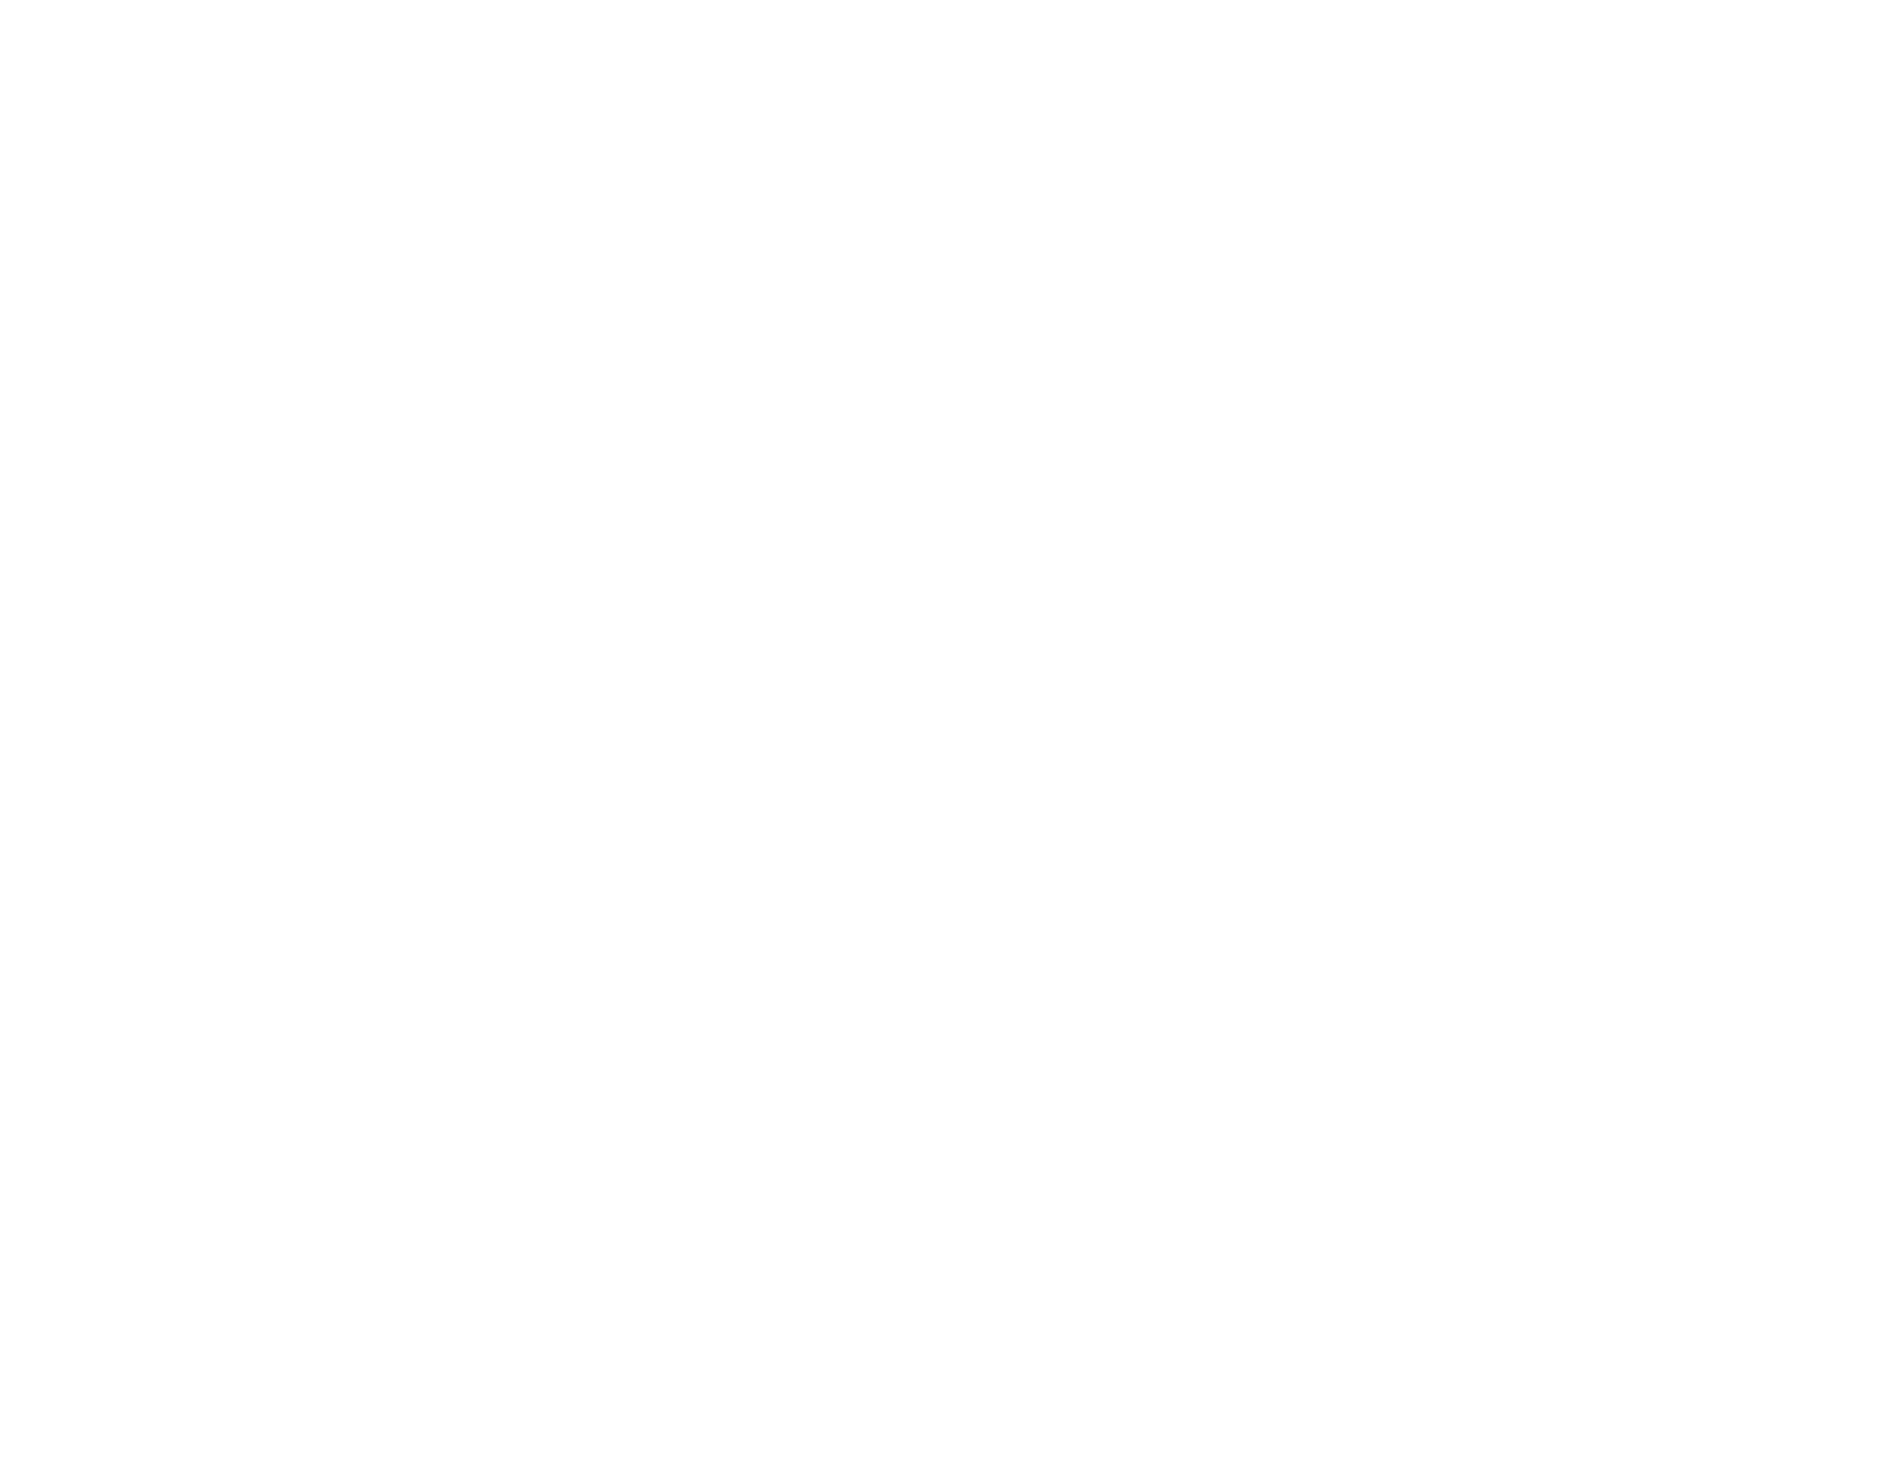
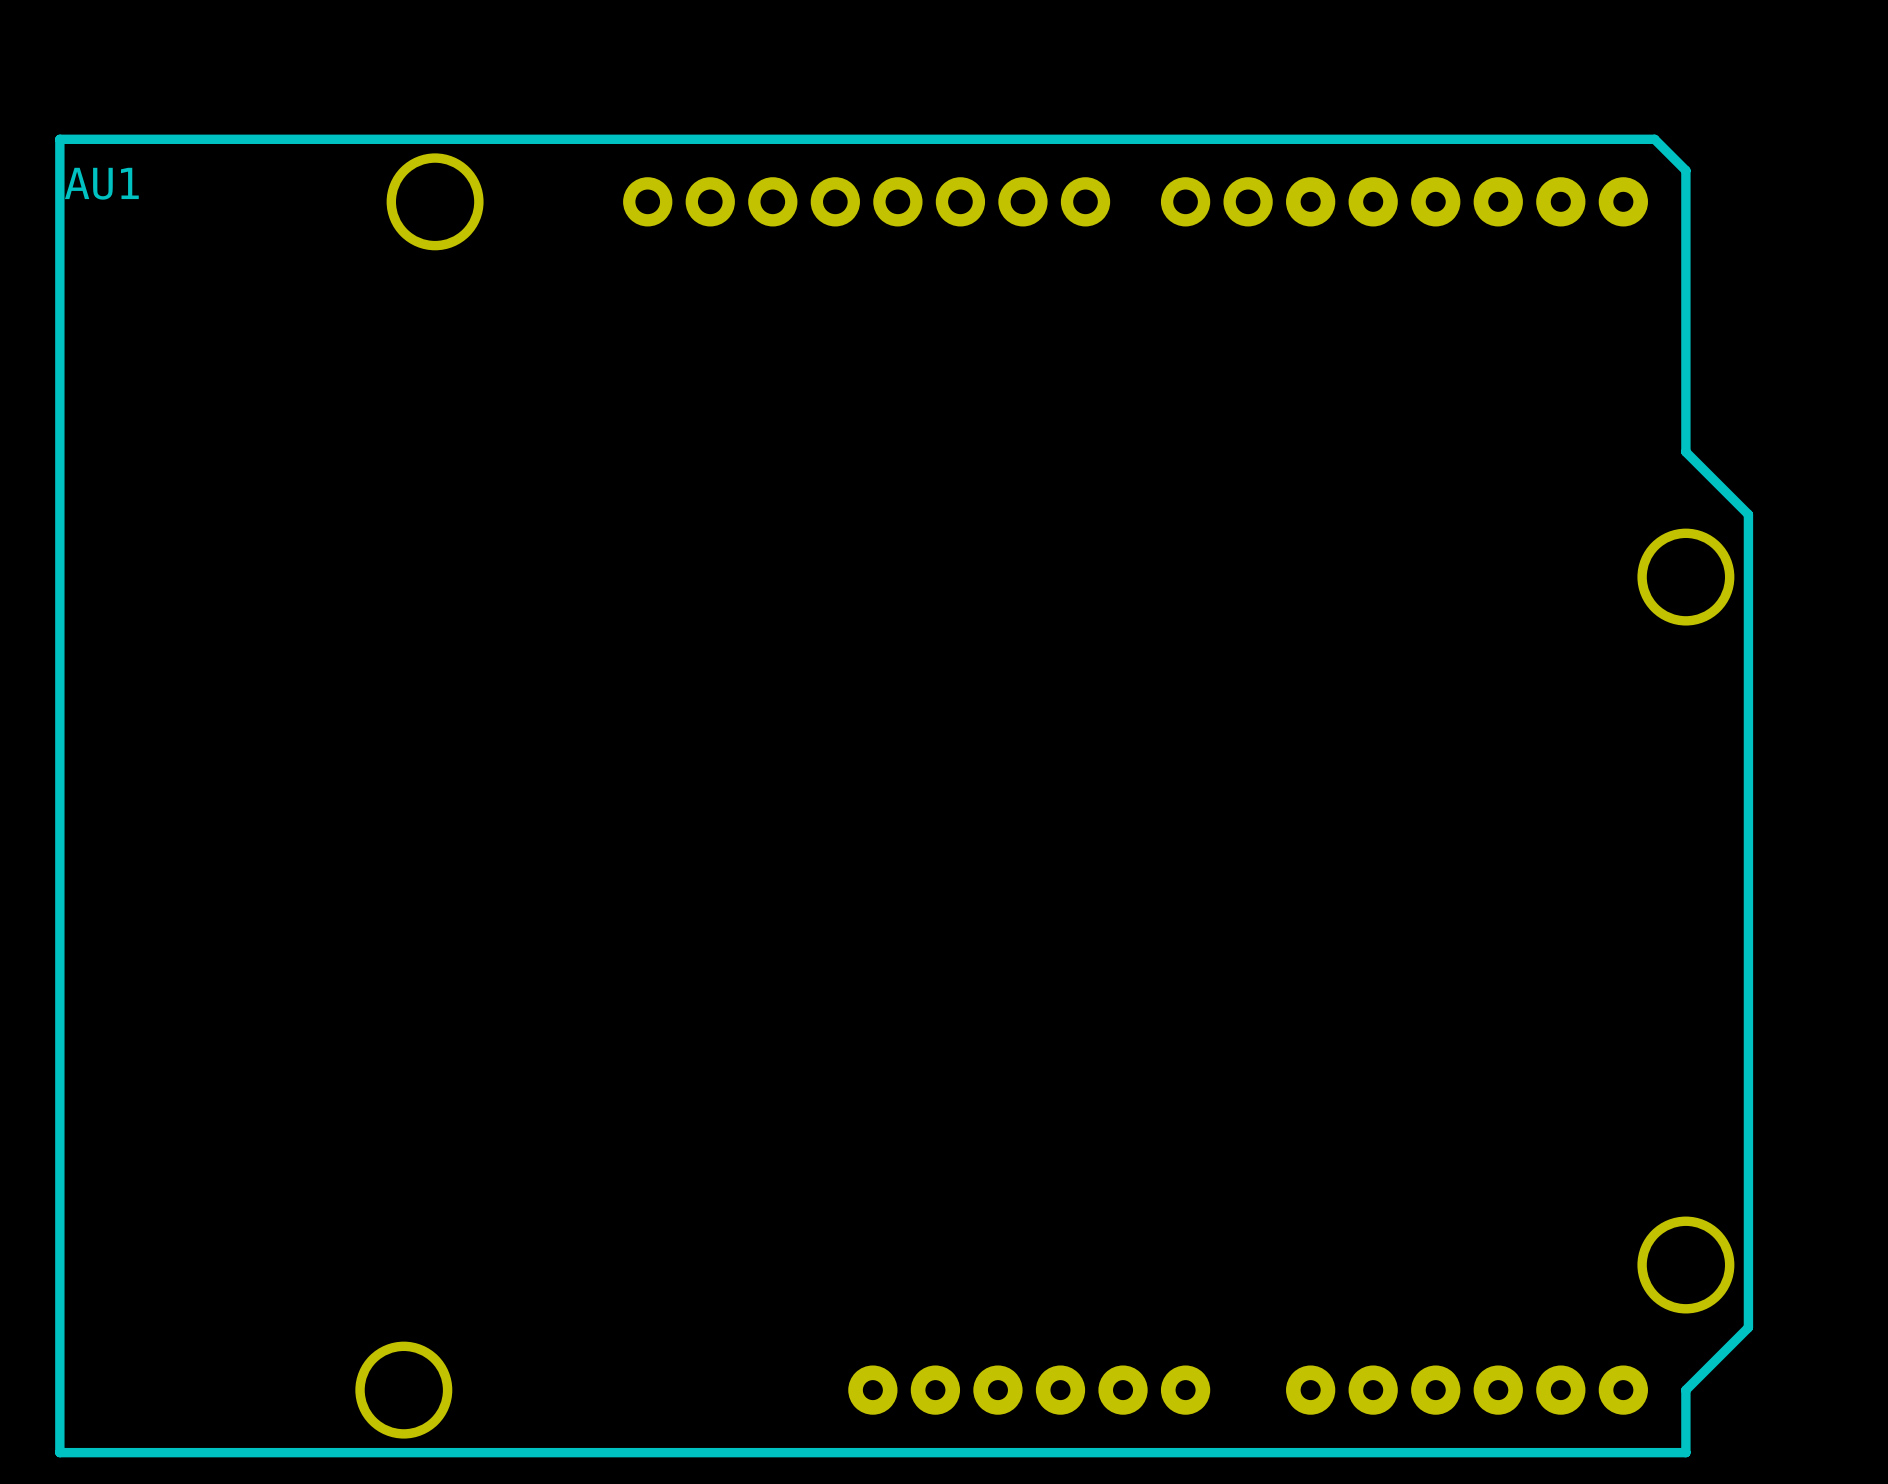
AU1: none -> (904, 795)

